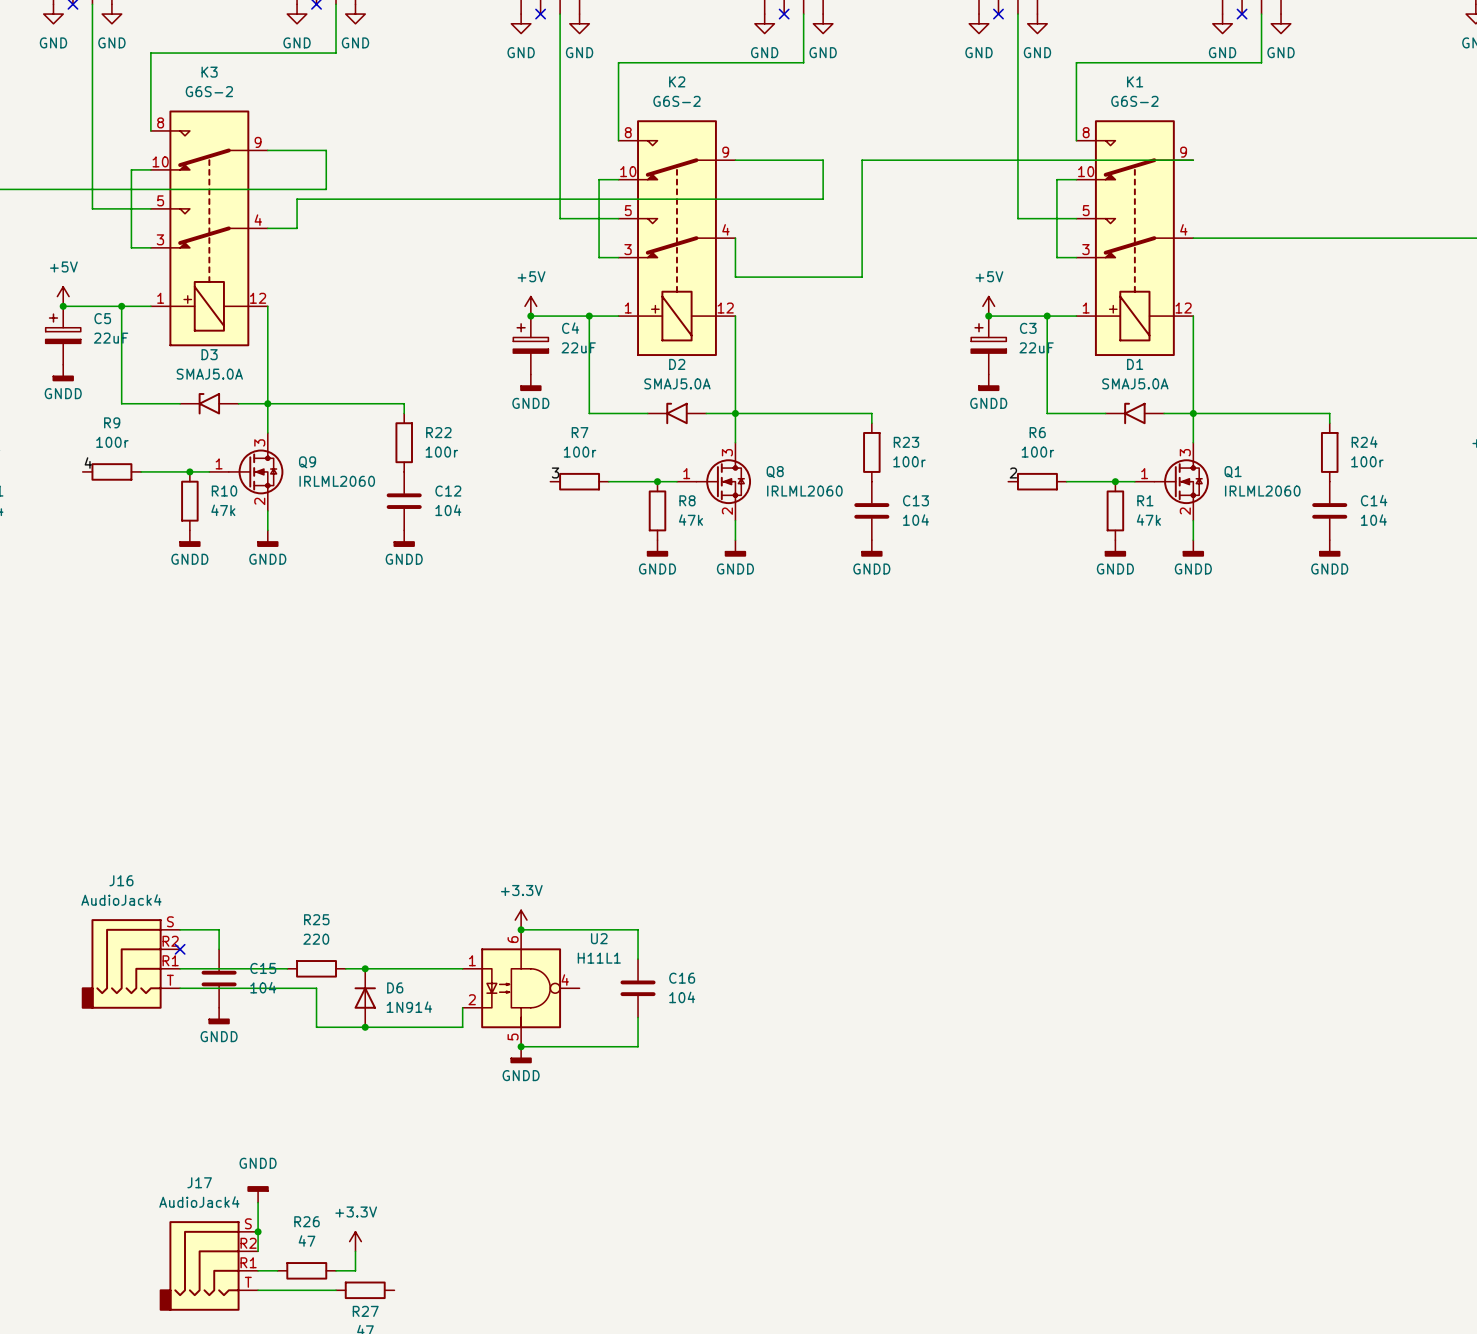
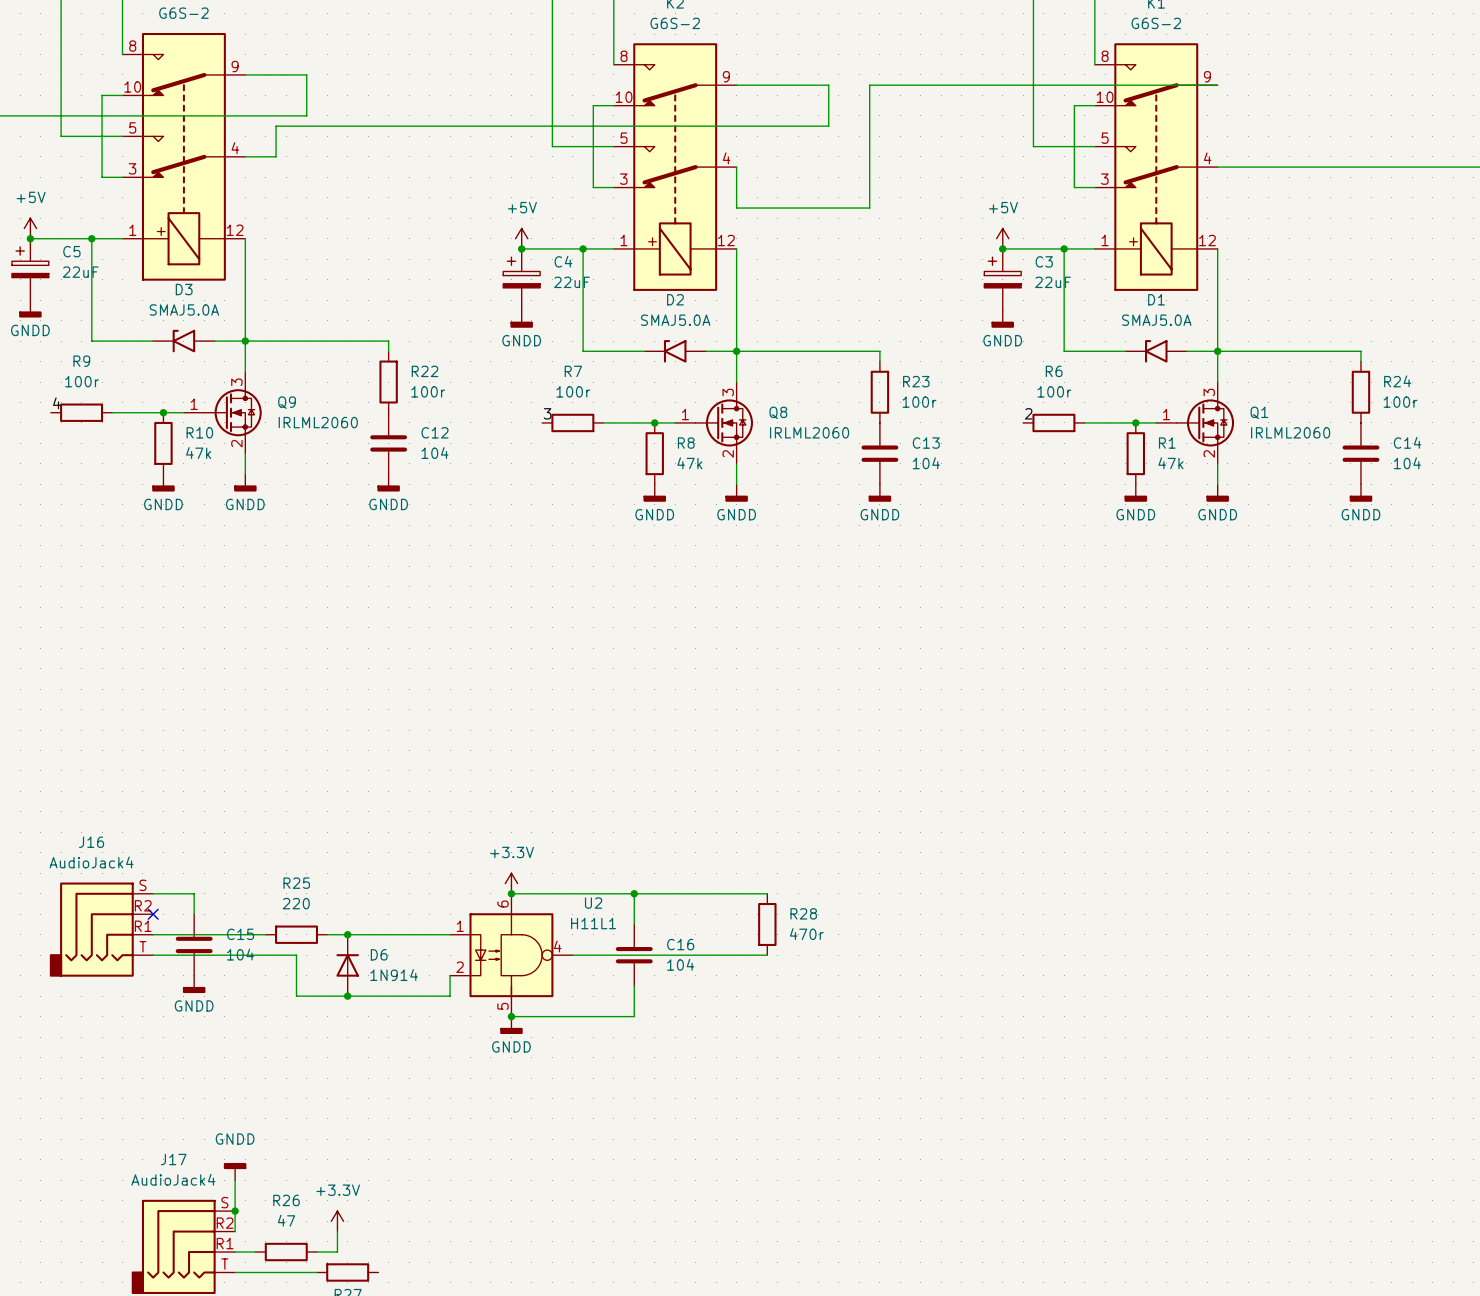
wire: none -> (634, 893) (767, 893)
junction: none -> (634, 893)
R28: none -> 470r (767, 924)
wire: none -> (572, 955) (767, 955)

